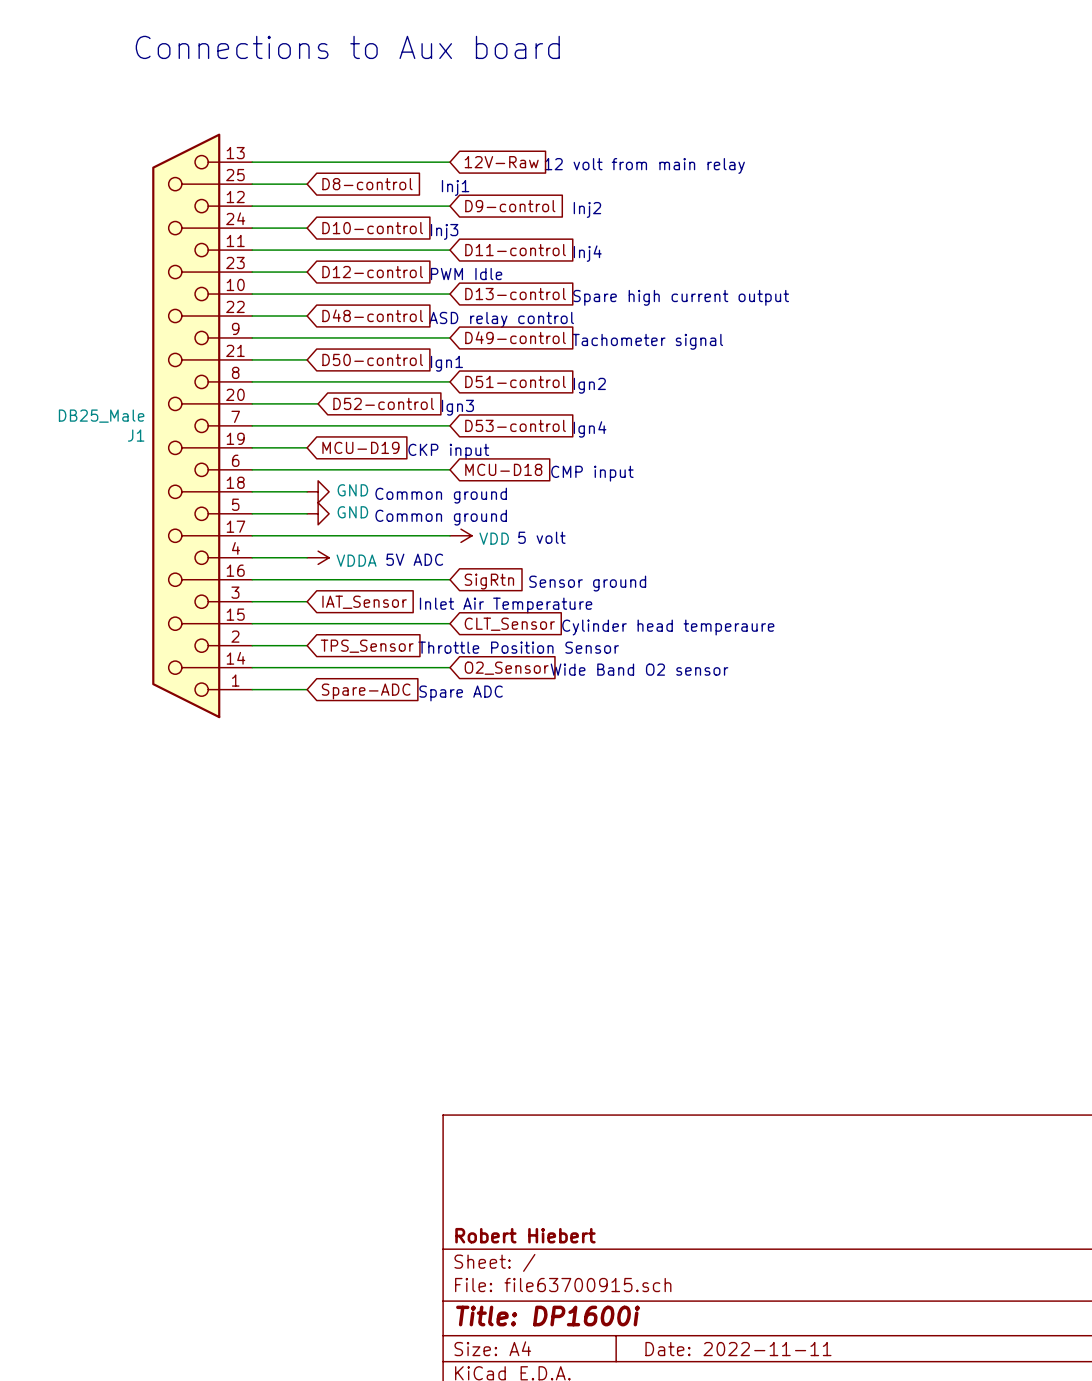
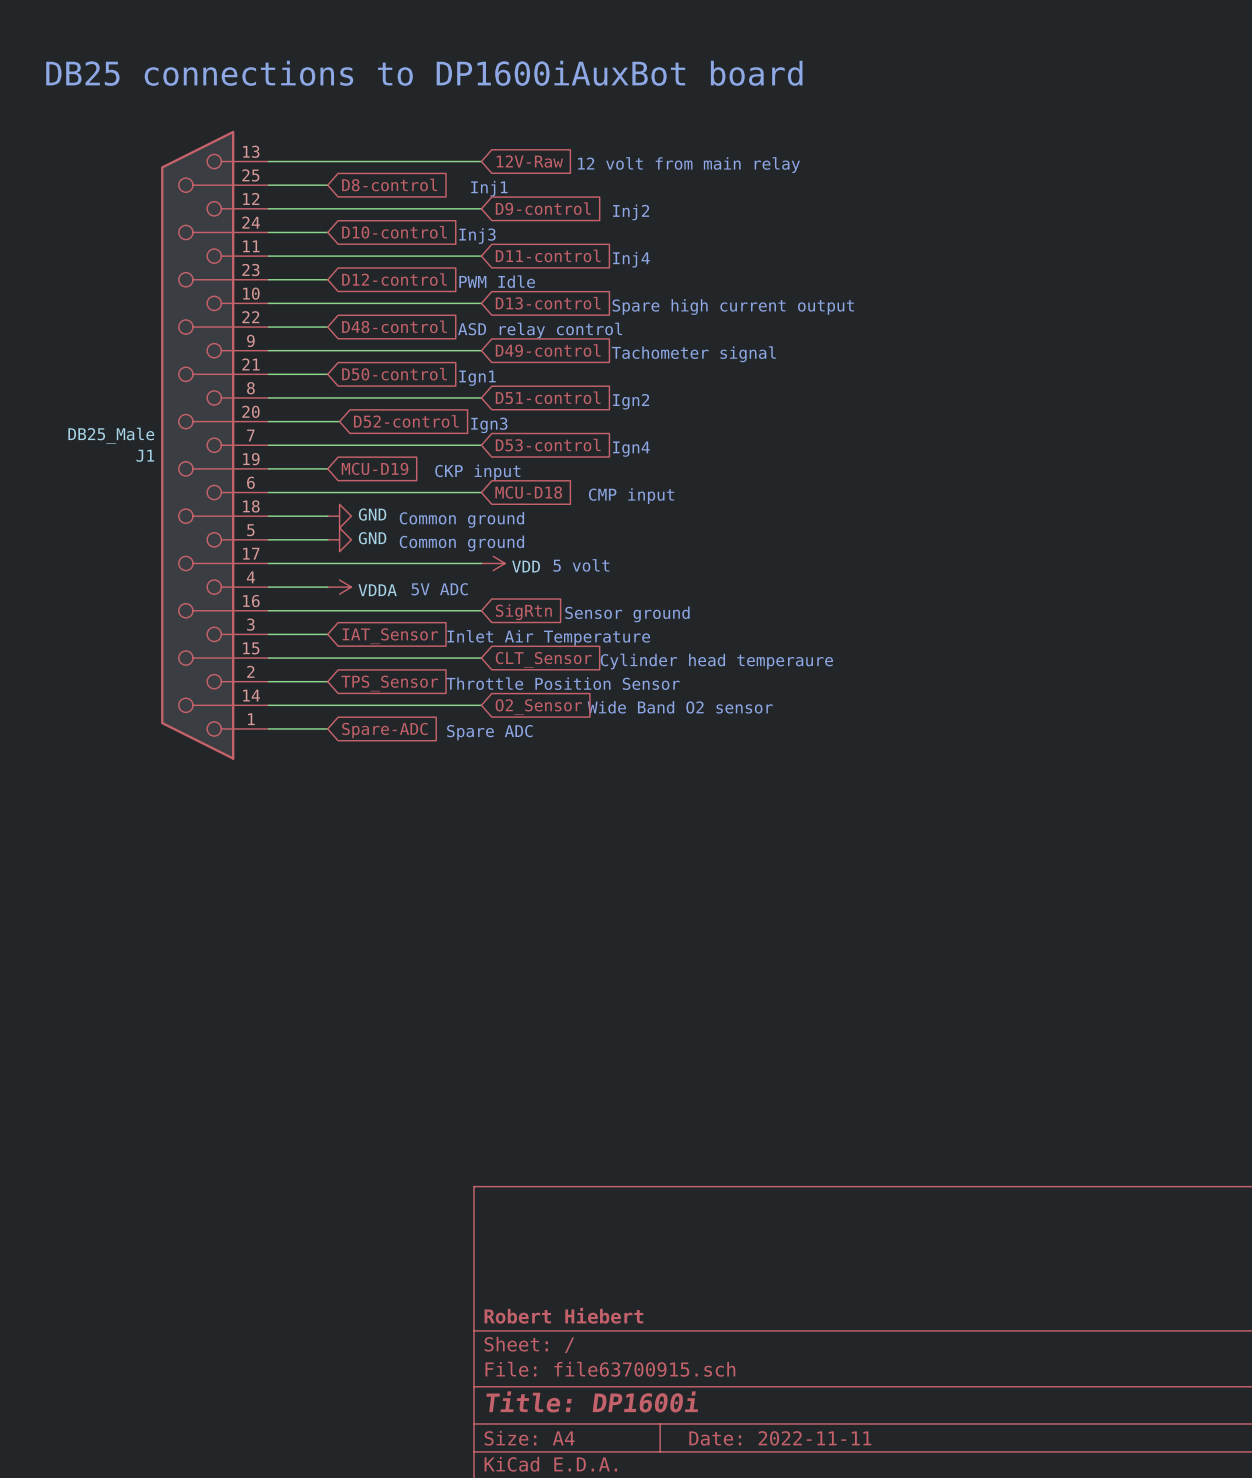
text: Connections to Aux board (347, 47) -> DB25 connections to DP1600iAuxBot board (424, 73)

